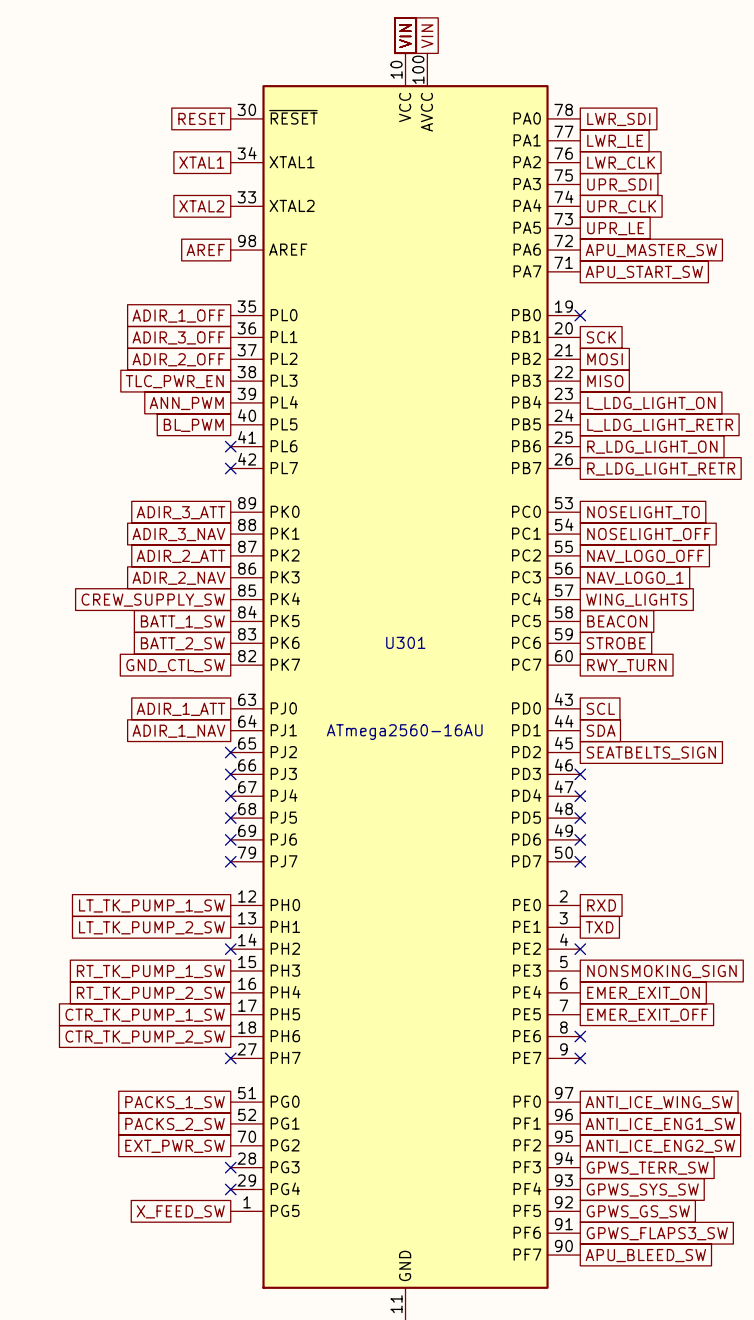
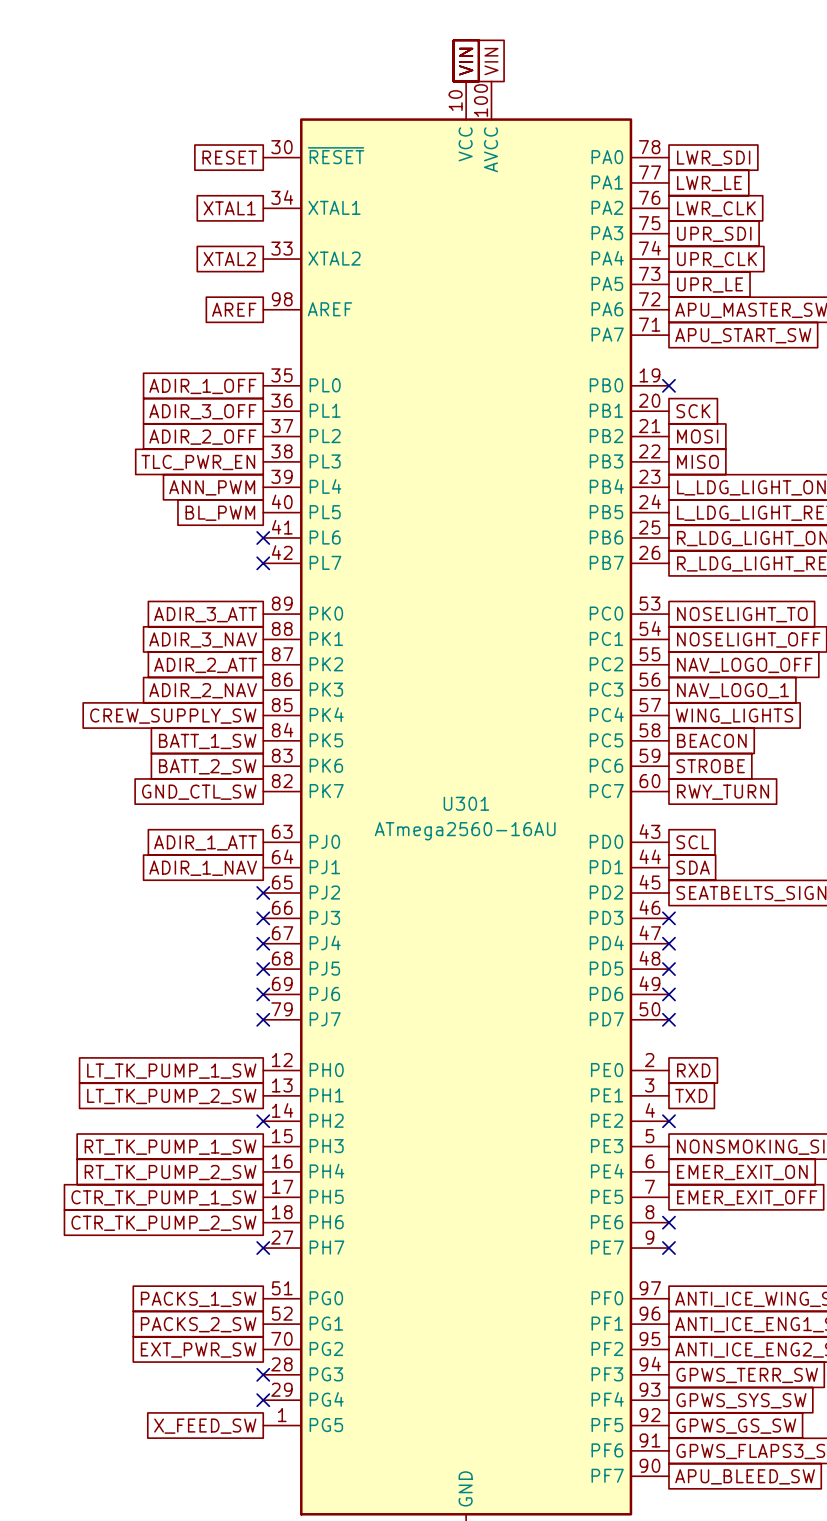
U301 name position: U301 (405, 642) -> U301 (466, 803)
U301 value position: ATmega2560-16AU (404, 732) -> ATmega2560-16AU (465, 831)

